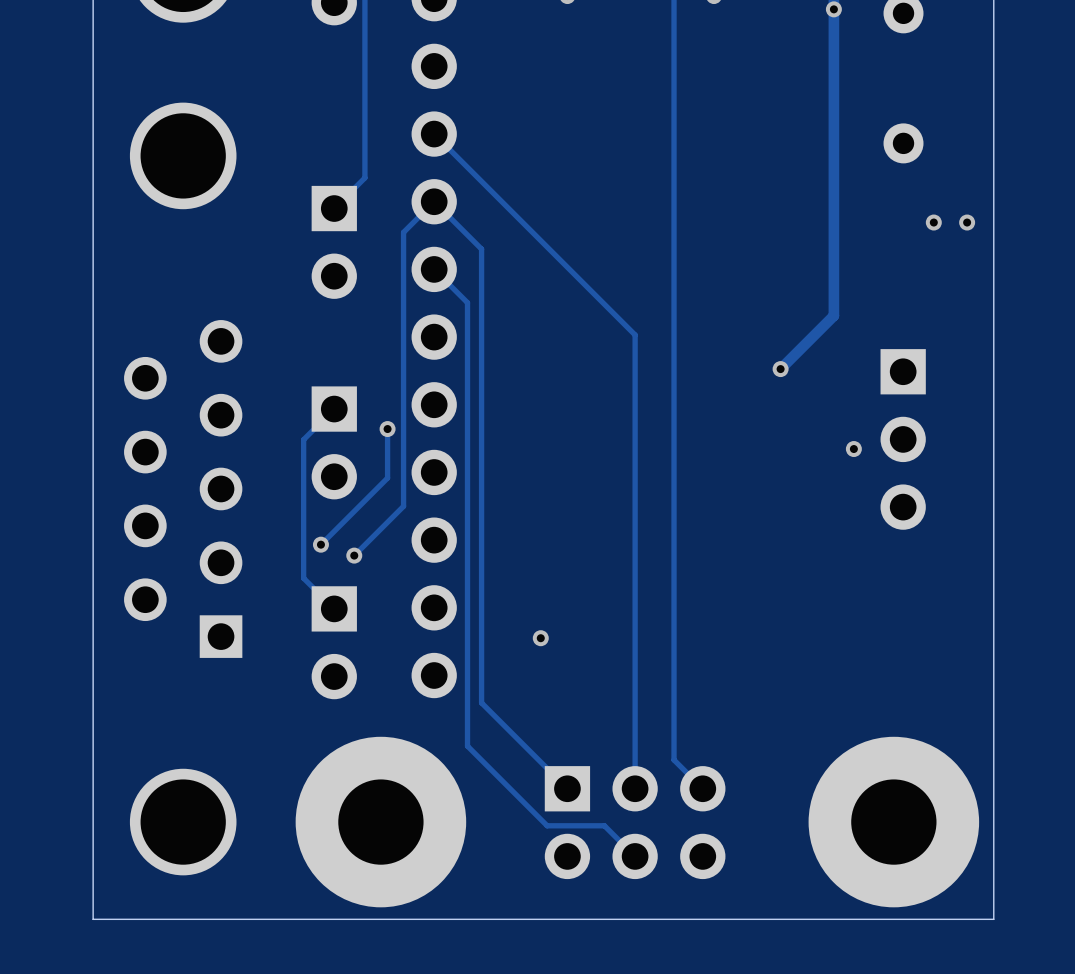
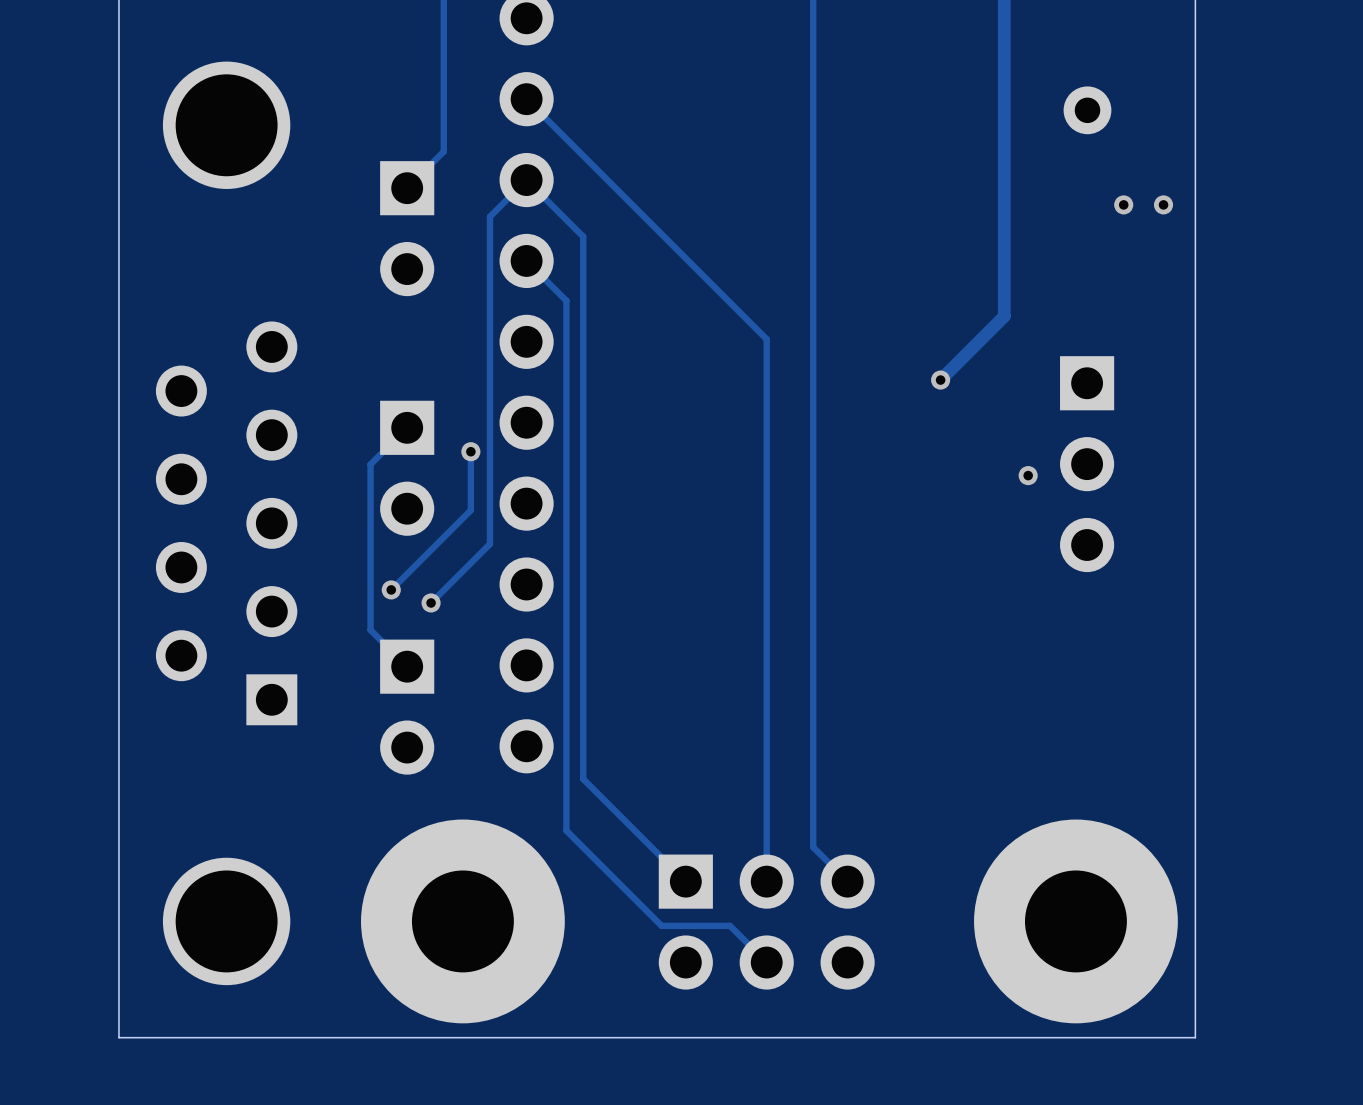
via: (540, 638) -> none

